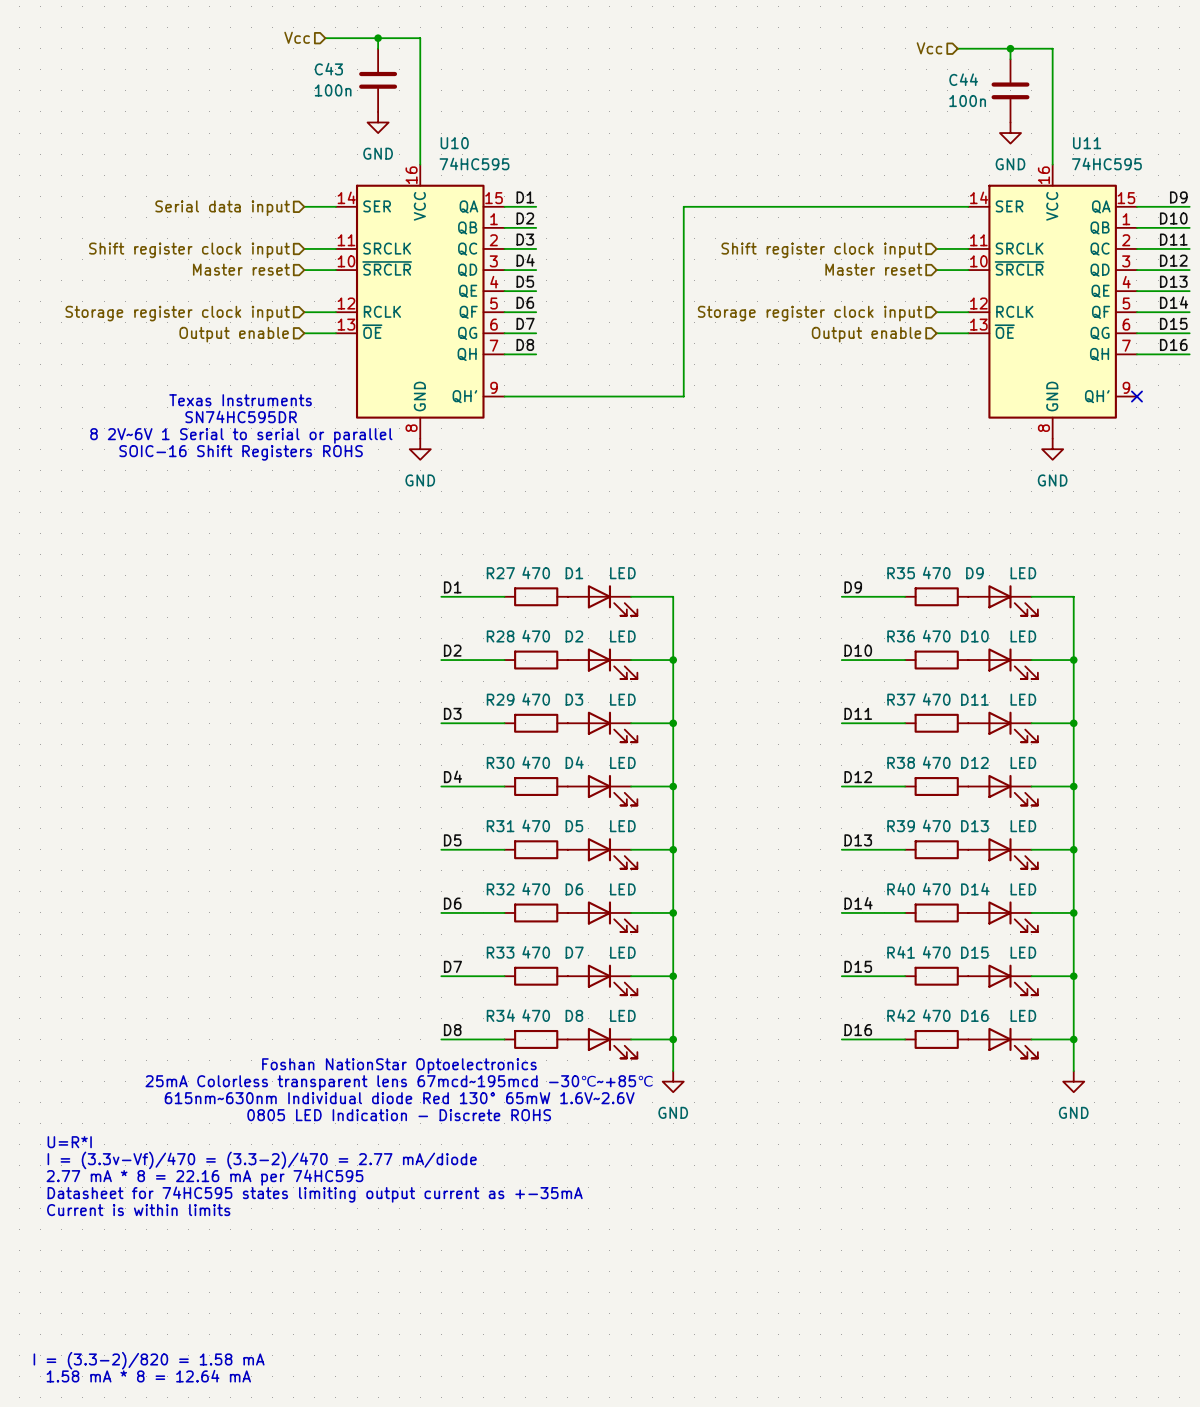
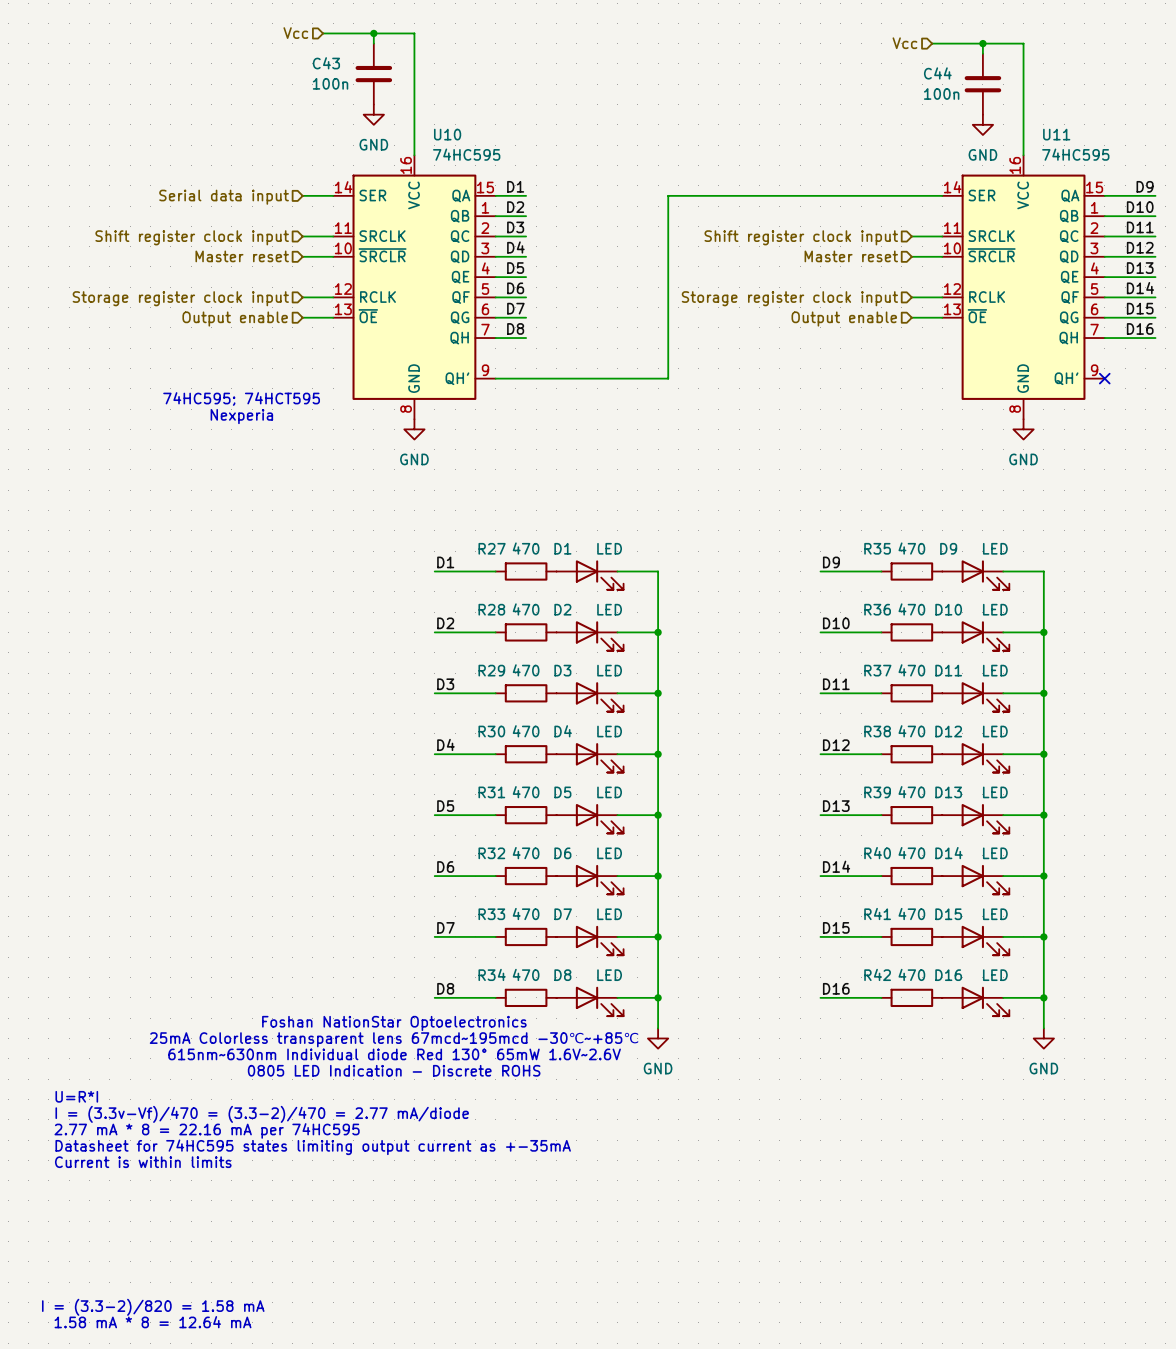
text: Texas Instruments (240, 400) -> none
text: SN74HC595DR (241, 416) -> 74HC595; 74HCT595 (241, 399)
text: 8 2V~6V 1 Serial to serial or parallel (241, 435) -> Nexperia (241, 416)
text: SOIC-16 Shift Registers ROHS (241, 452) -> none

